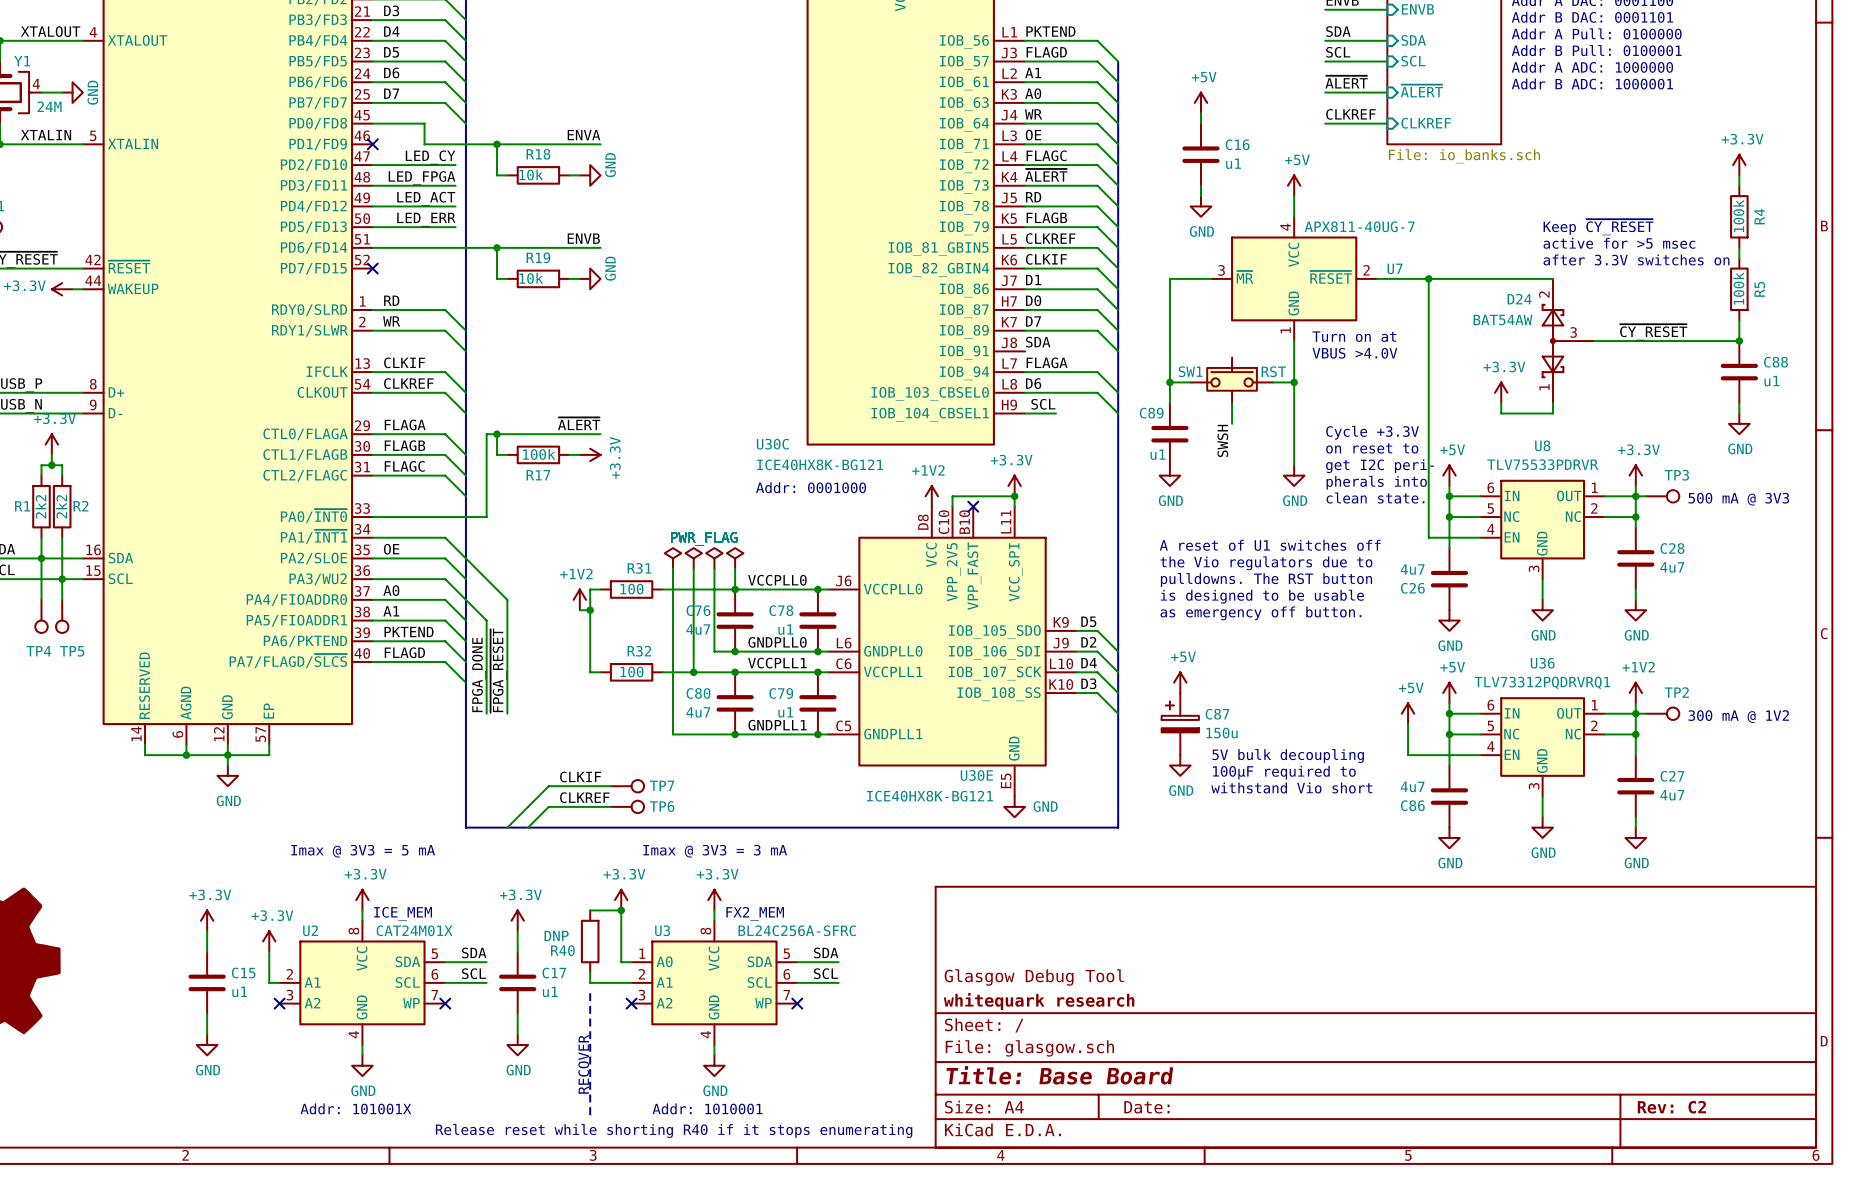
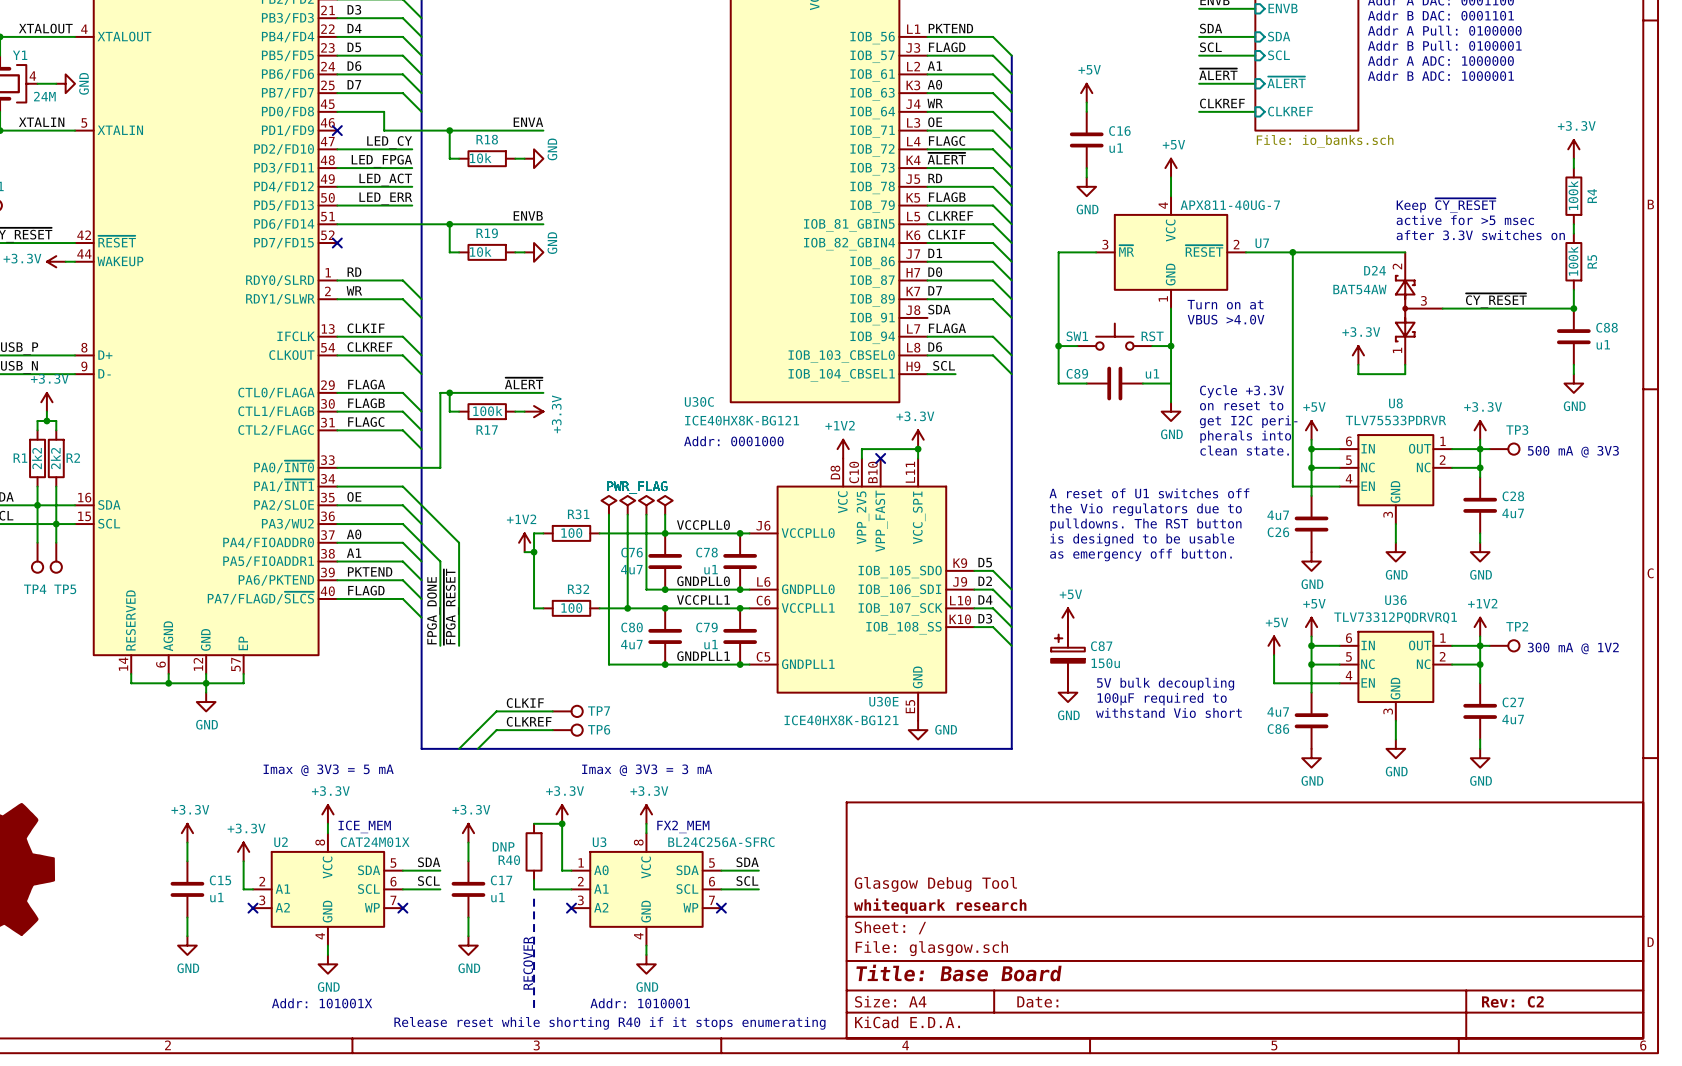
SW1 symbol: [1190, 357, 1274, 404] -> [1077, 323, 1153, 350]
wire: none -> (1058, 364) (1058, 383) (1086, 383)
wire: (1232, 403) (1232, 423) -> none
C89 name position: C89 (1151, 413) -> C89 (1077, 373)
wire: none -> (1142, 383) (1171, 383)
C89 rotation: 0° (1169, 434) -> 90° clockwise (1114, 383)
C89 position: (1169, 434) -> (1114, 383)
label: SWSH (1222, 440) -> none
C89 value position: u1 (1157, 454) -> u1 (1152, 373)
power symbol: GND (1169, 475) -> none
power symbol position: GND (1294, 475) -> GND (1171, 411)

